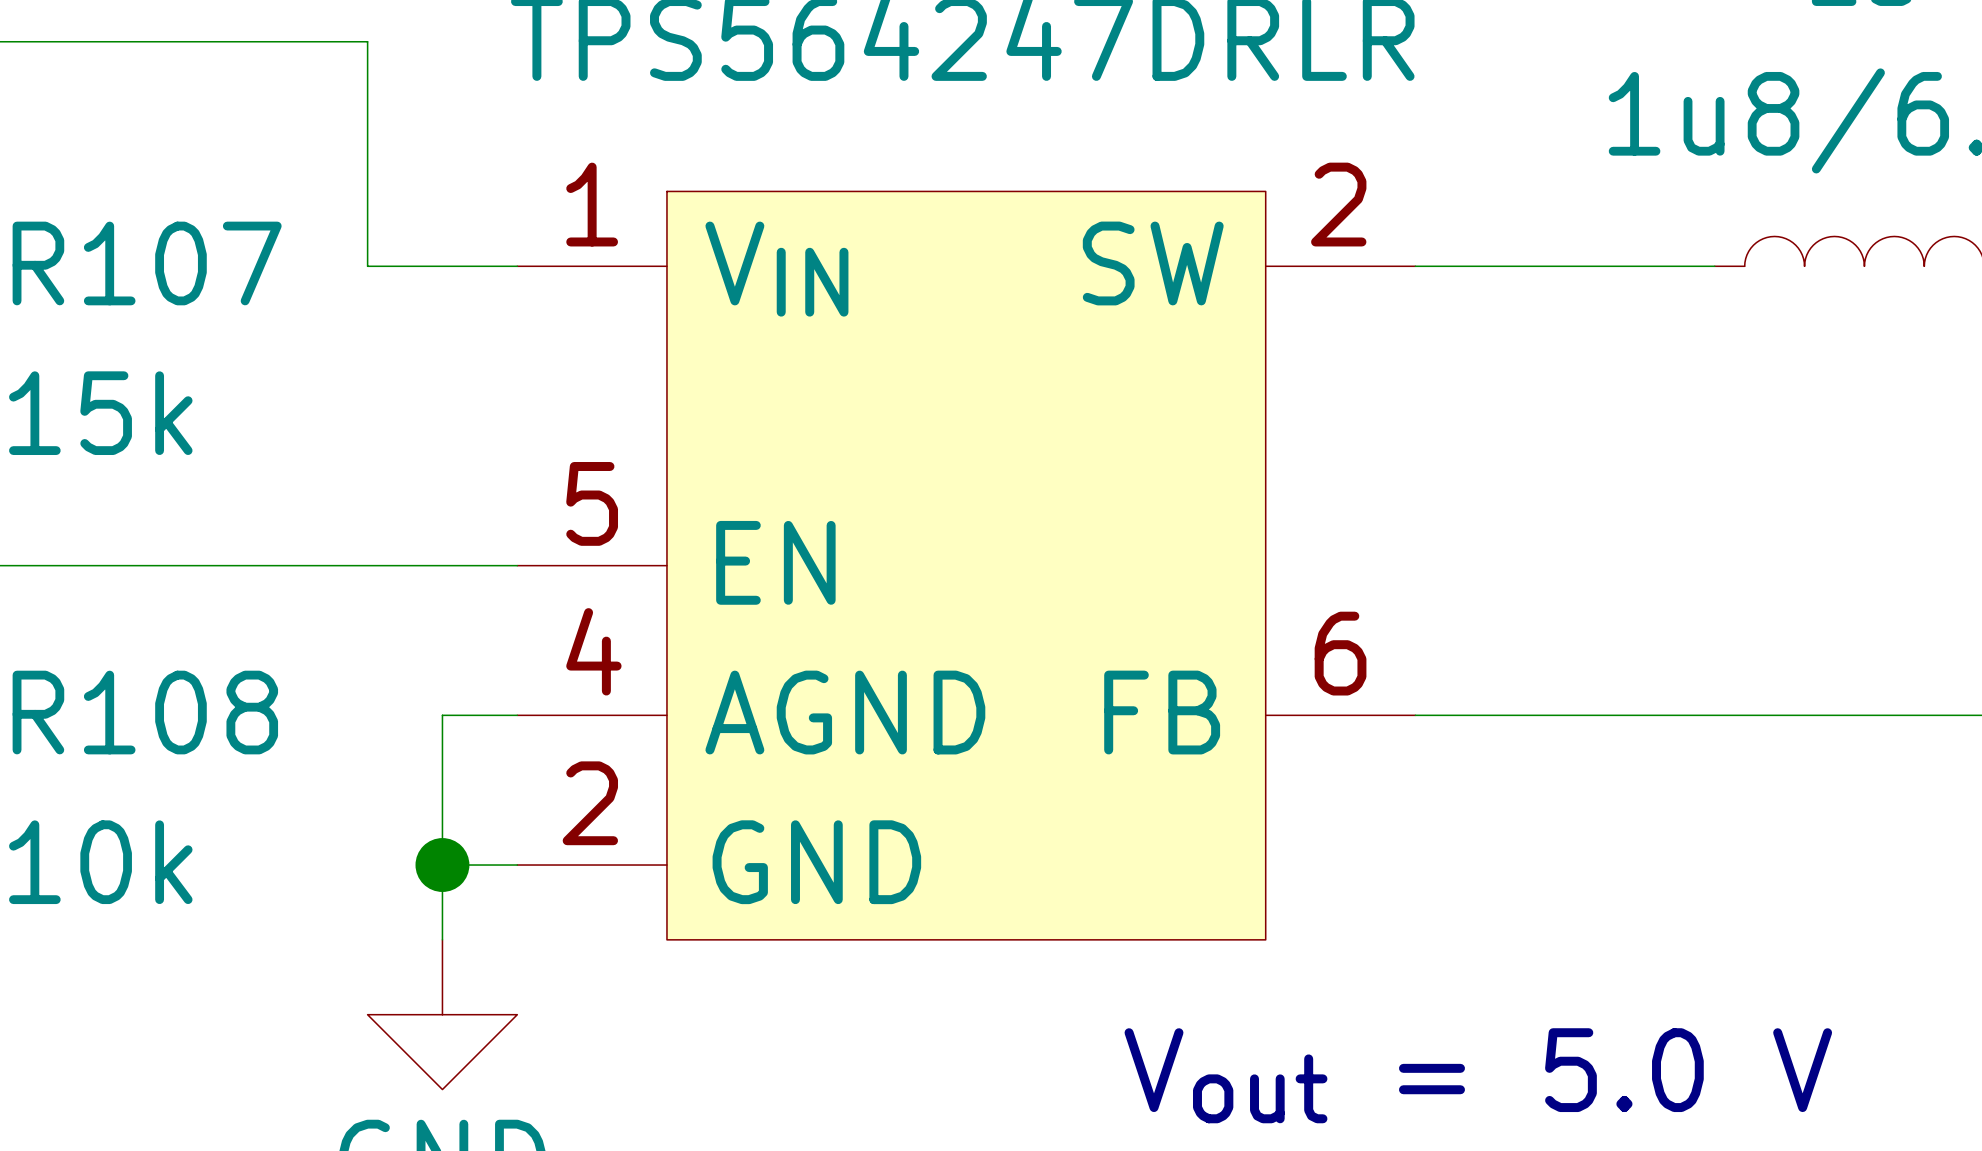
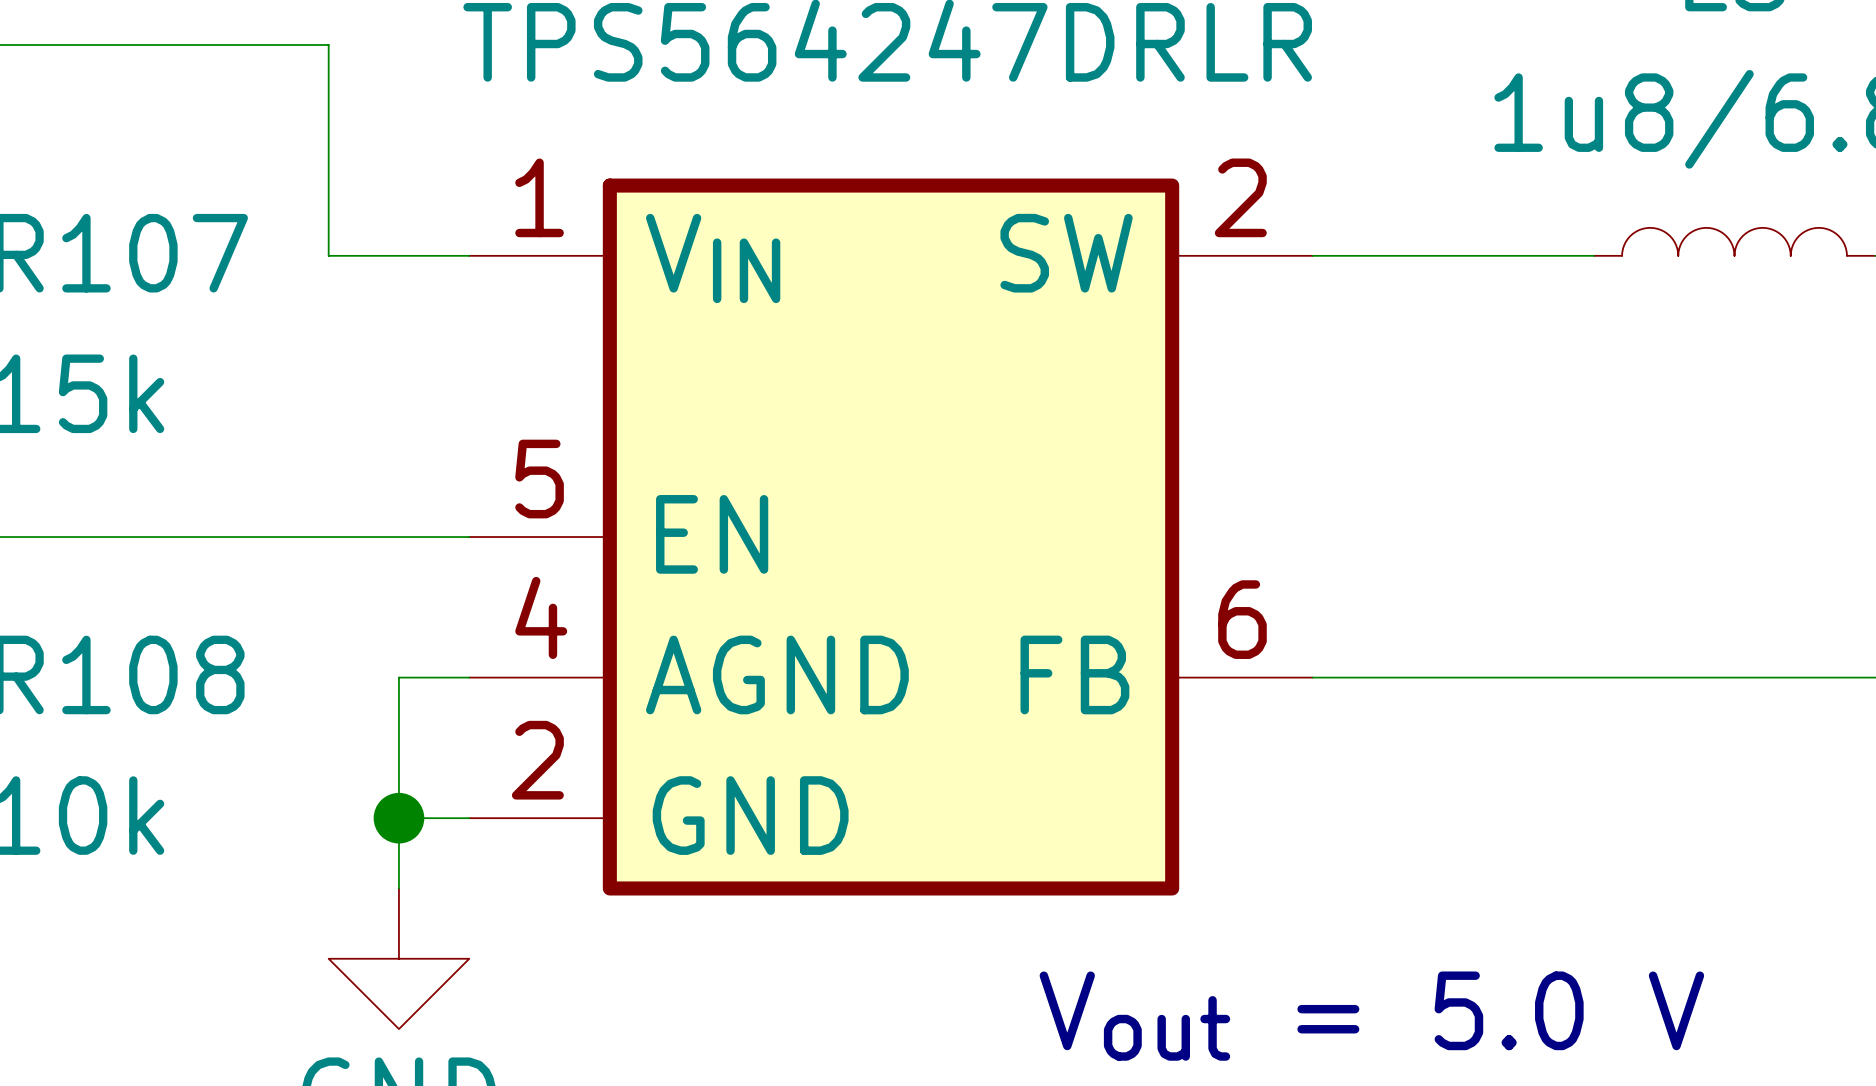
part symbol: [517, 191, 1416, 940] -> [469, 178, 1313, 896]

